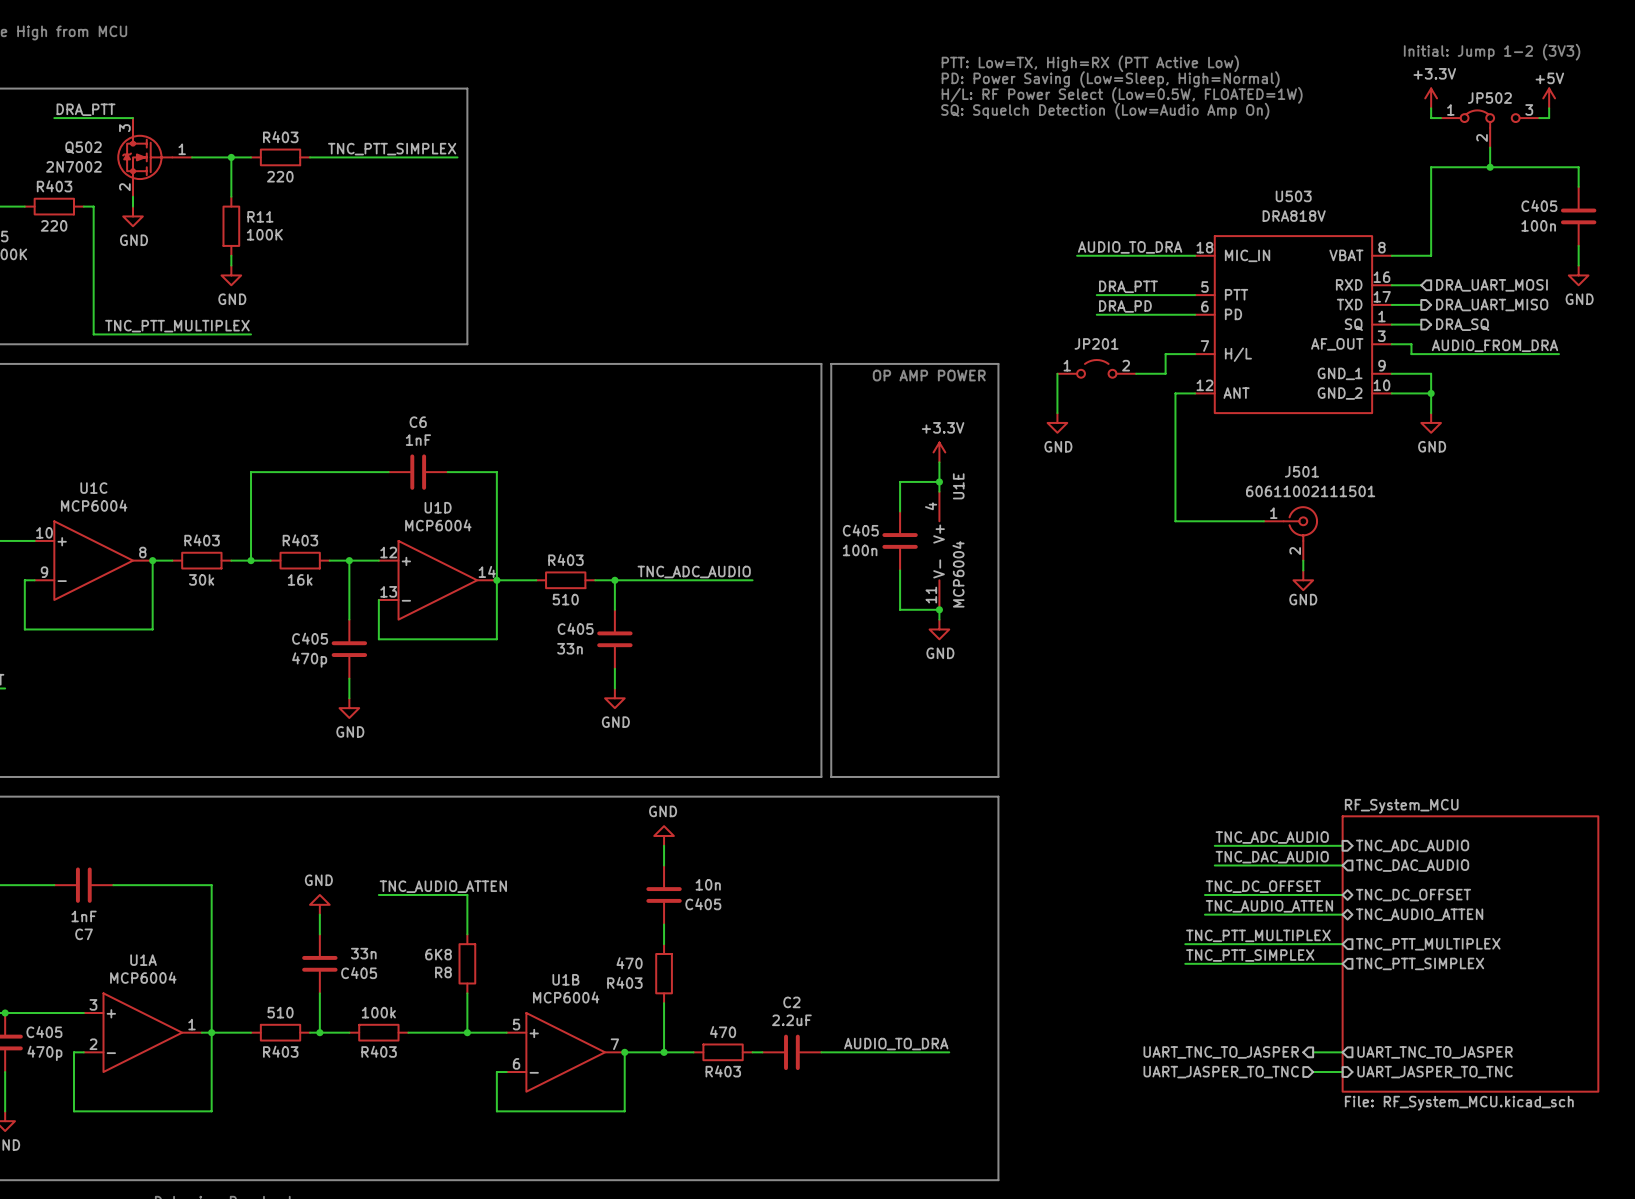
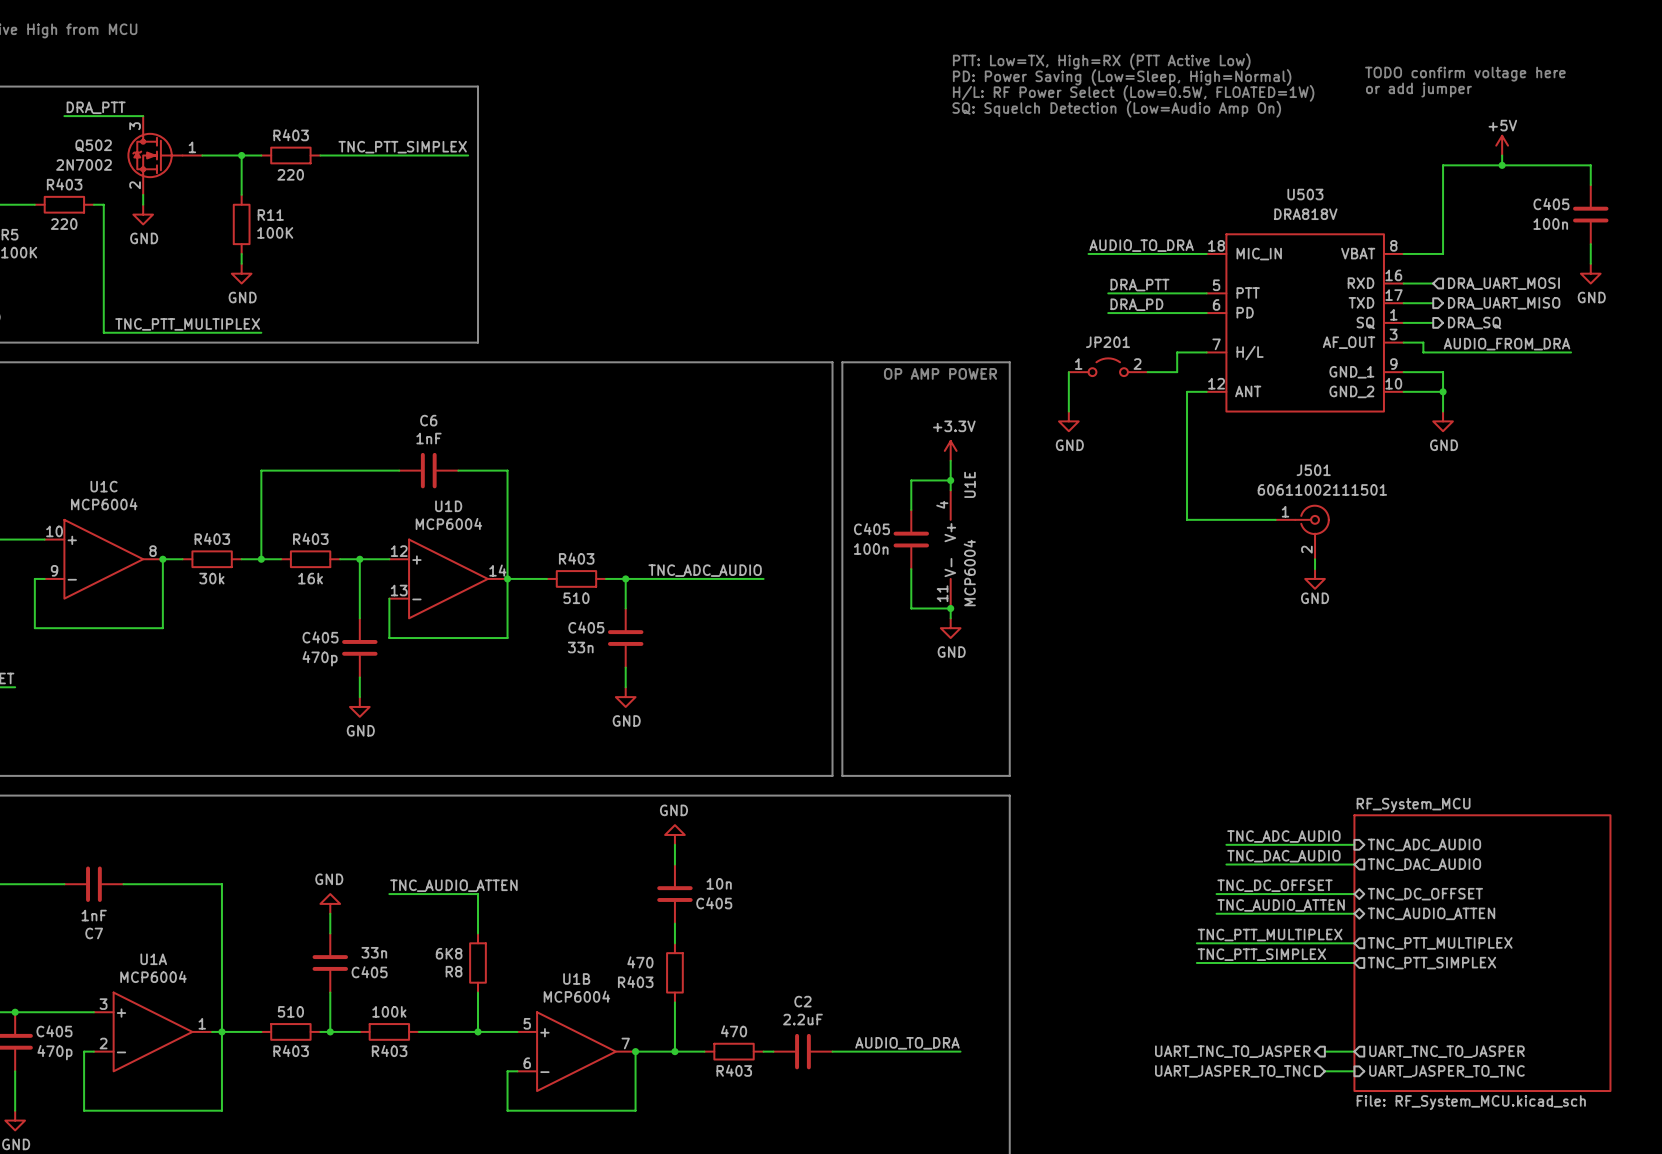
text: Initial: Jump 1-2 (3V3) (1492, 52) -> none
text: none -> TODO confirm voltage here (1465, 74)
text: none -> or add jumper (1418, 89)
power symbol: +3.3V (1431, 98) -> none
power symbol position: +5V (1549, 98) -> +5V (1502, 145)
wire: (1431, 108) (1431, 118) (1440, 118) -> none
wire: (1549, 108) (1549, 118) (1539, 118) -> none
JP502: (1490, 128) -> none

